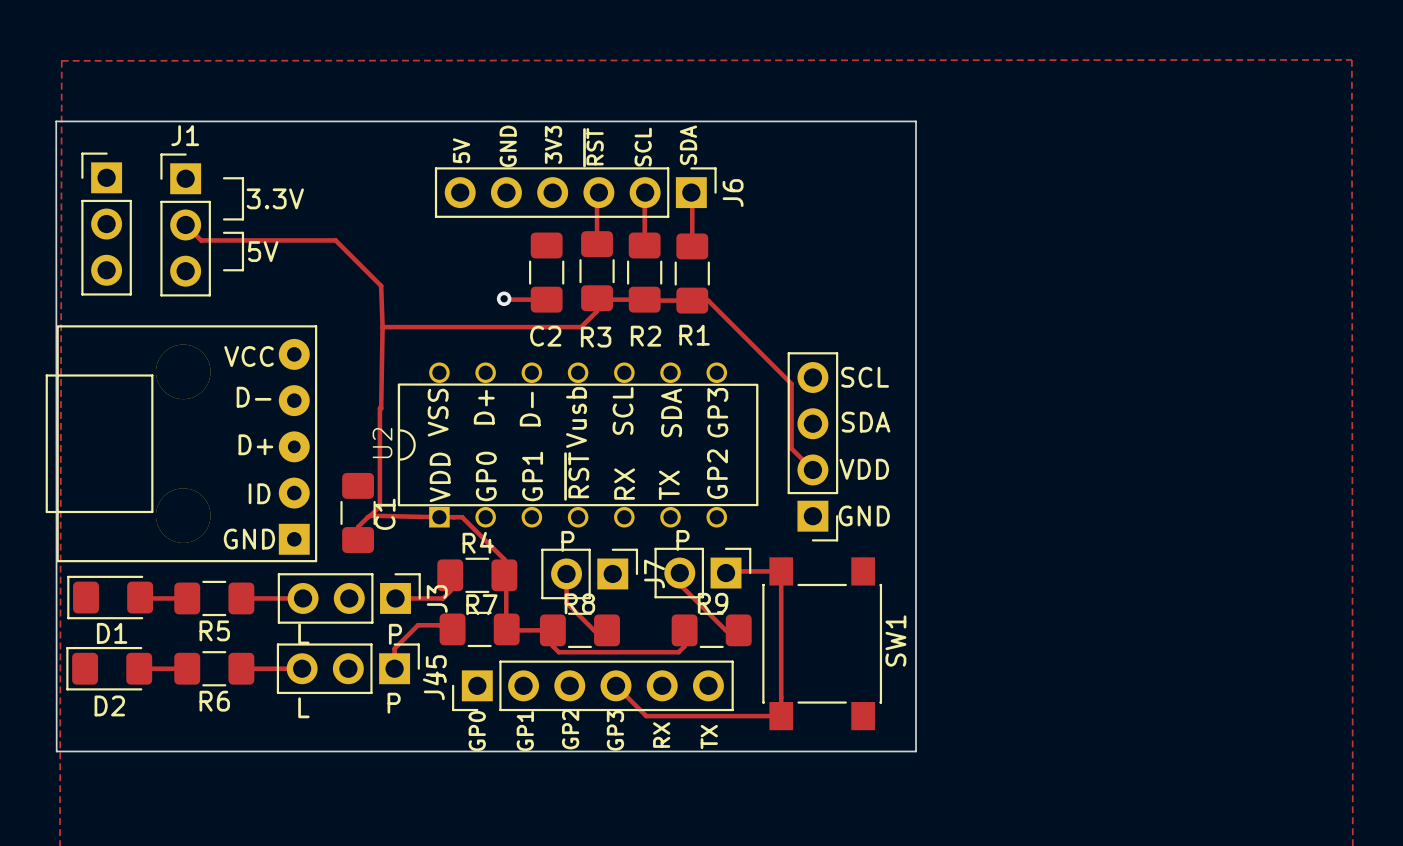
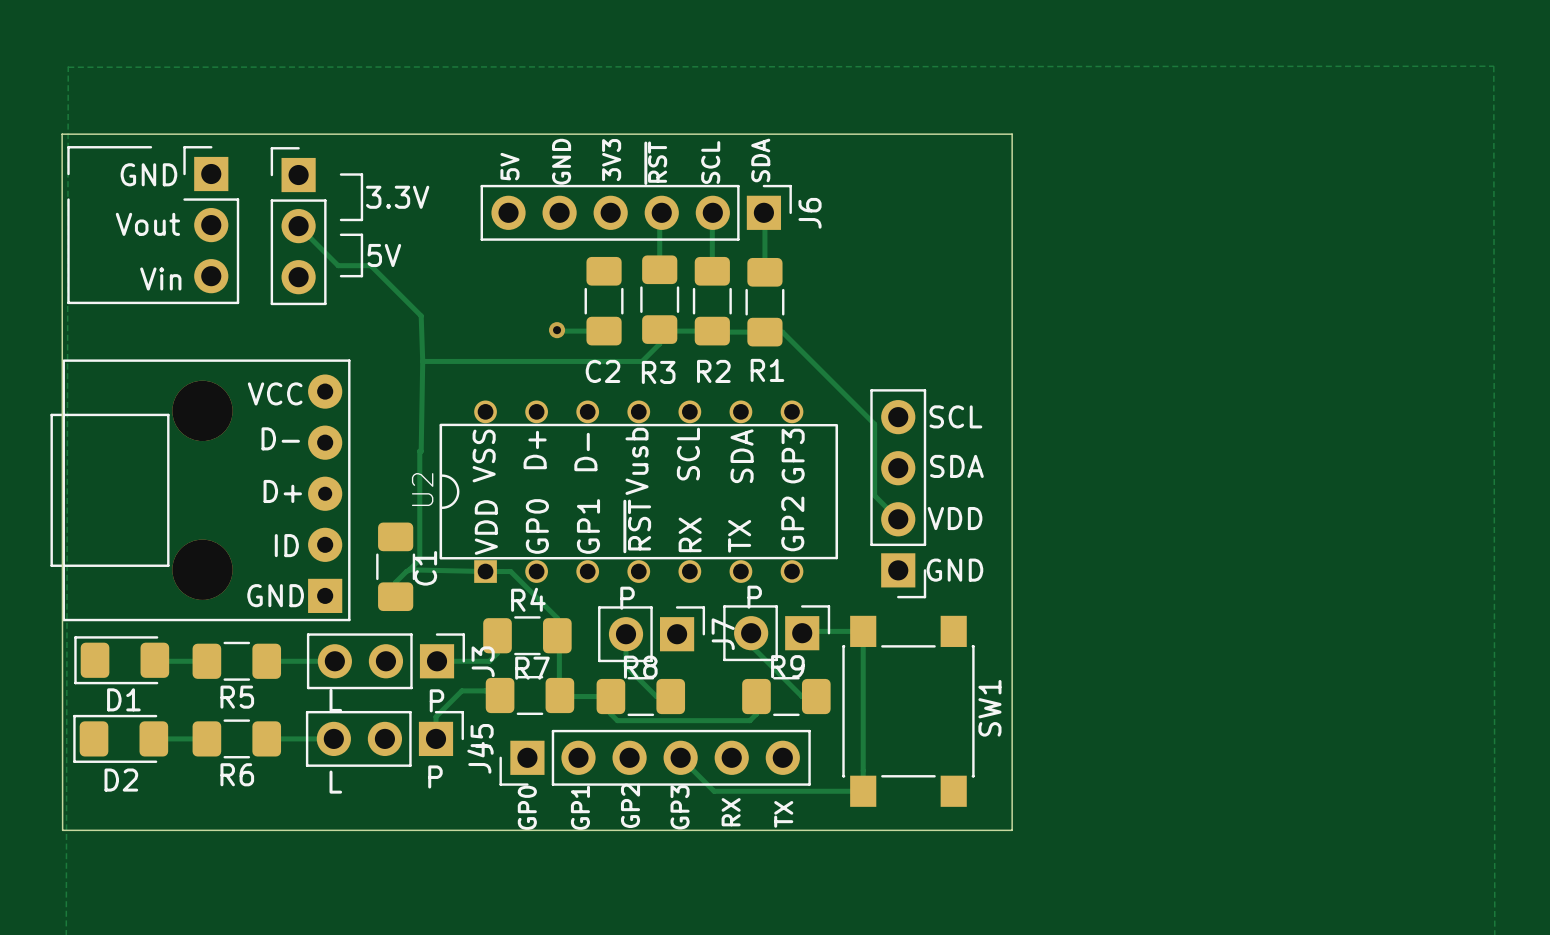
line: (224, 178) (242, 178) (242, 219) (224, 219) -> (341, 174) (361, 174) (361, 219) (341, 219)
text position: 3.3V (275, 198) -> 3.3V (397, 197)
part: none -> (153, 225)
part position: (106, 224) -> (298, 226)
track: (185, 224) (201, 240) (306, 240) -> (298, 226) (338, 265)
J1: (185, 224) -> none
line: (224, 232) (242, 232) (242, 270) (224, 270) -> (341, 234) (361, 234) (361, 276) (341, 276)
text position: 5V (263, 251) -> 5V (384, 255)

